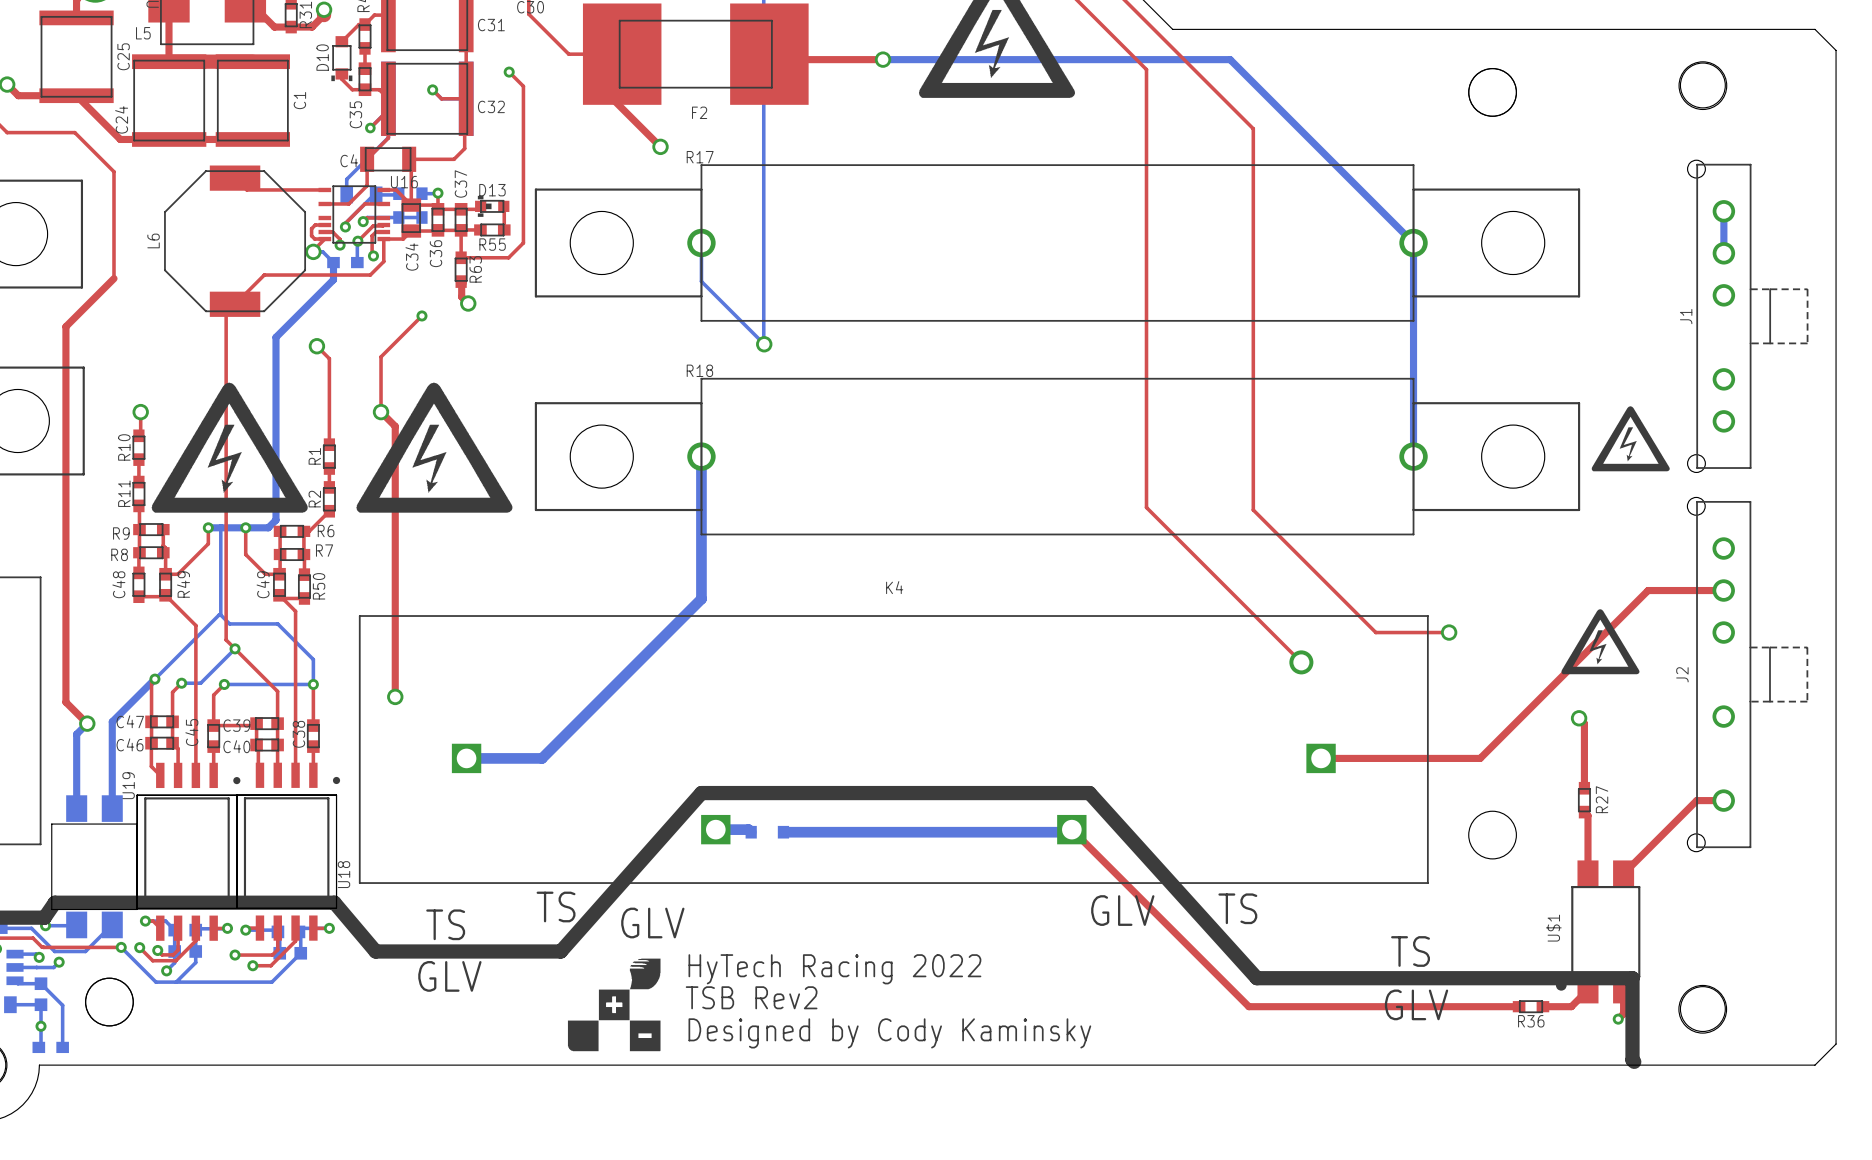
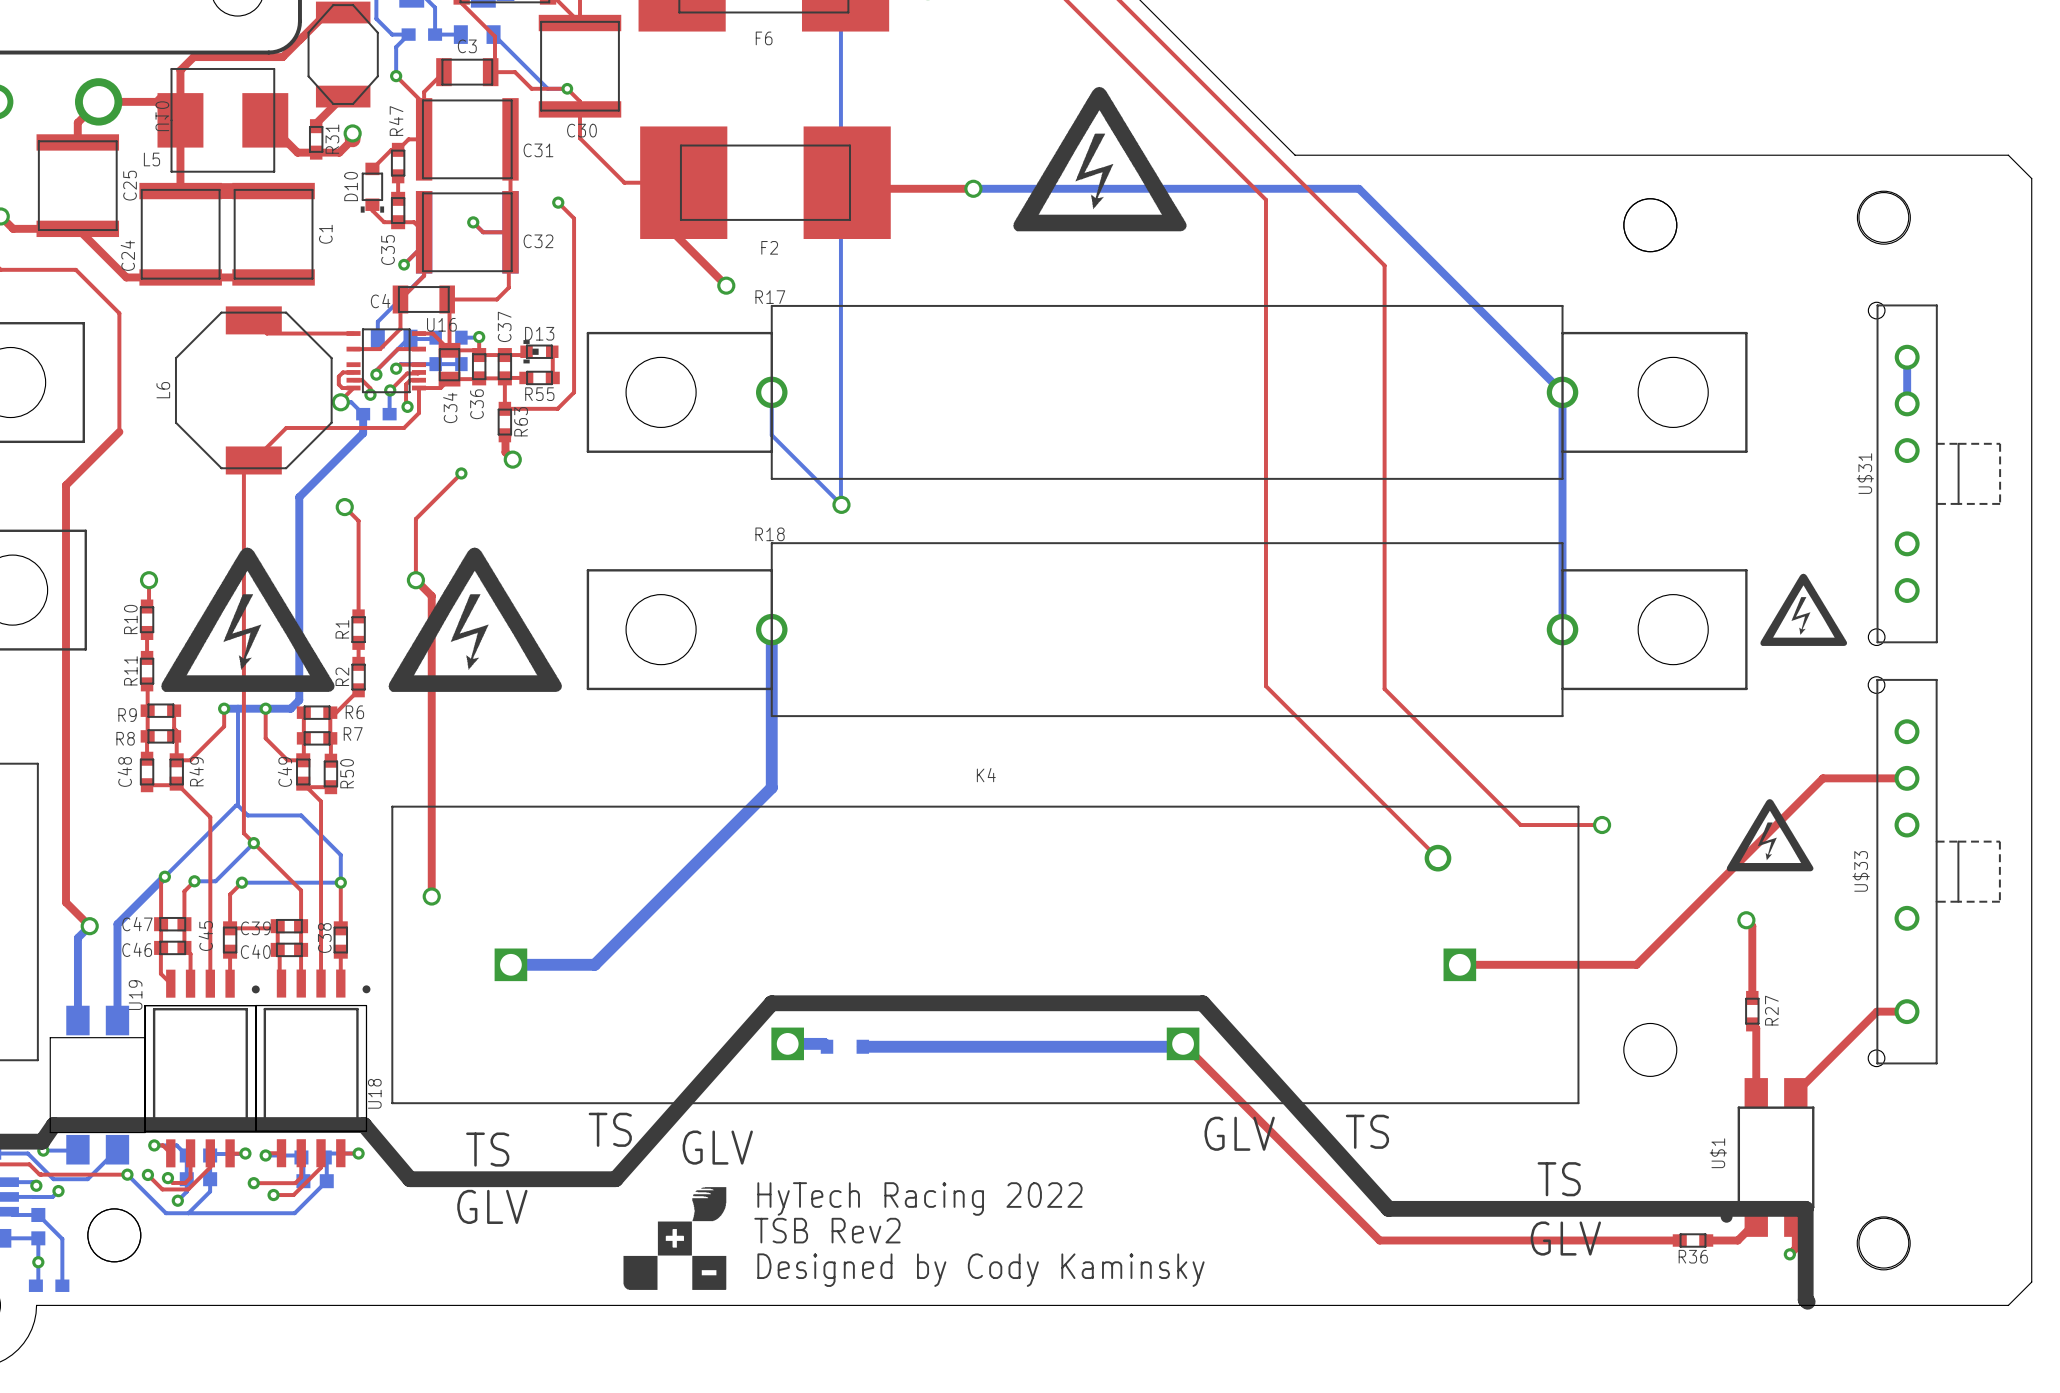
J1: (1748, 316) -> none
U$31: none -> (1934, 473)
J2: (1747, 674) -> none
U$33: none -> (1934, 871)

